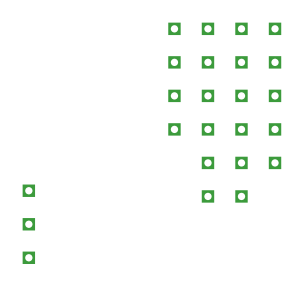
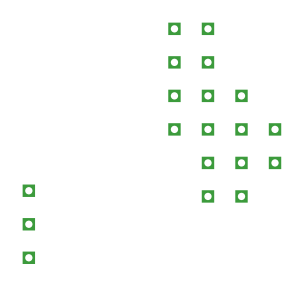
part: (241, 28) -> none
part: (275, 28) -> none
part: (241, 62) -> none
part: (275, 62) -> none
part: (275, 95) -> none

